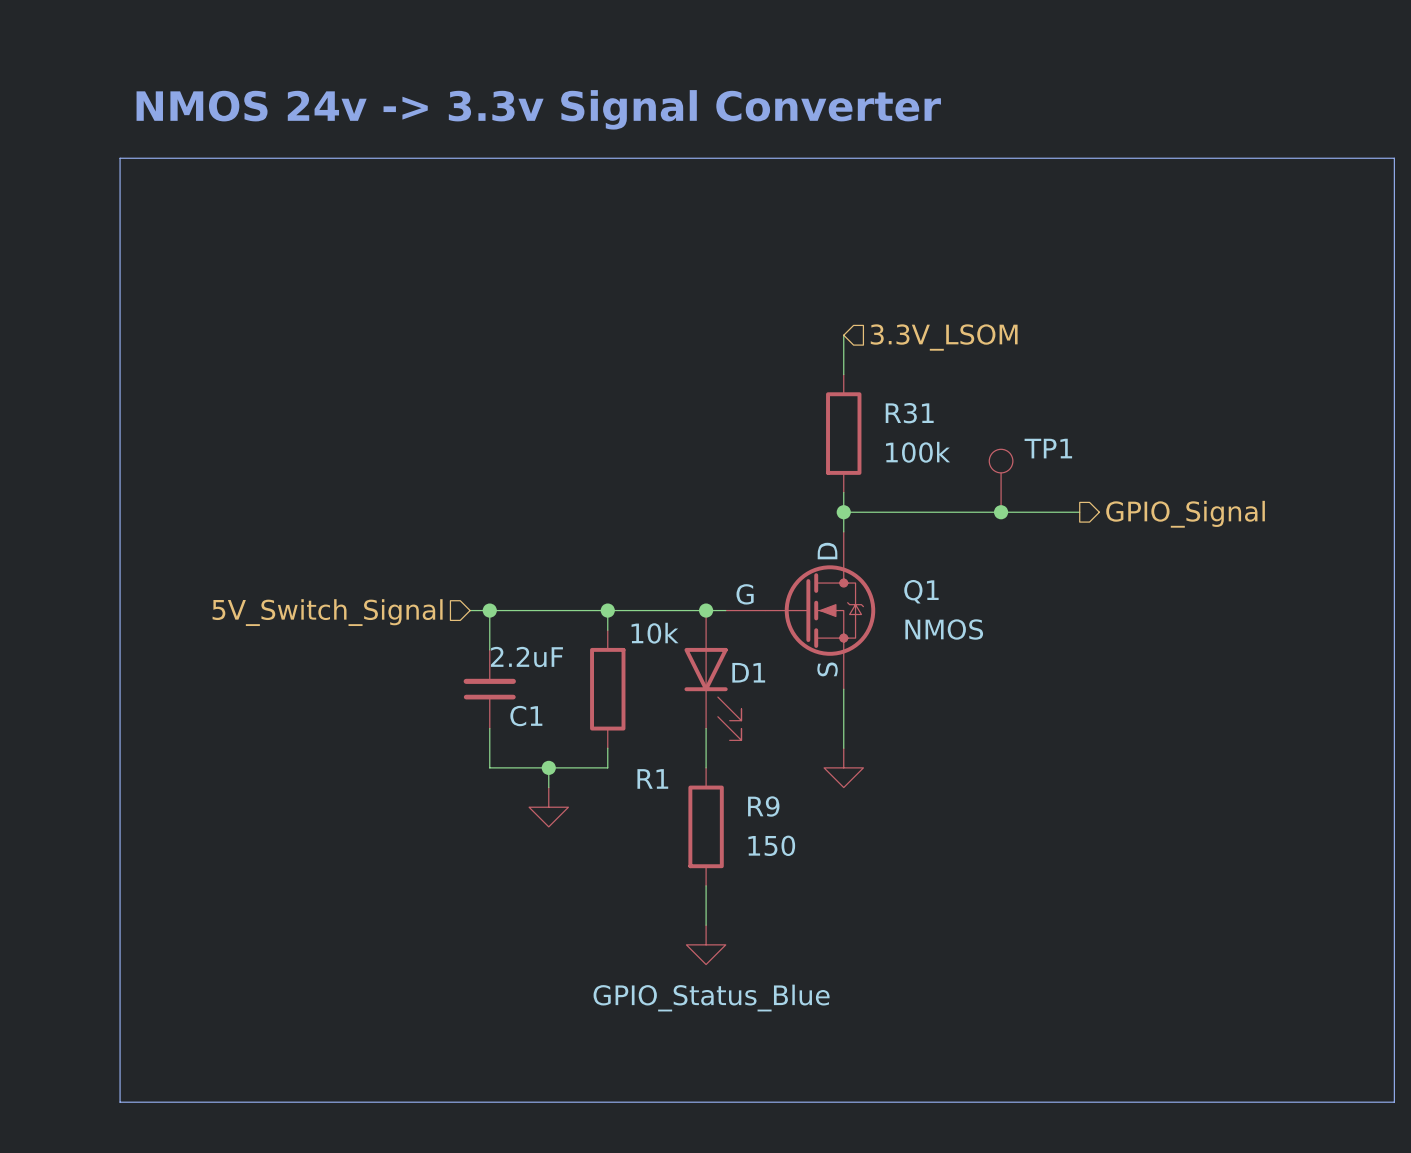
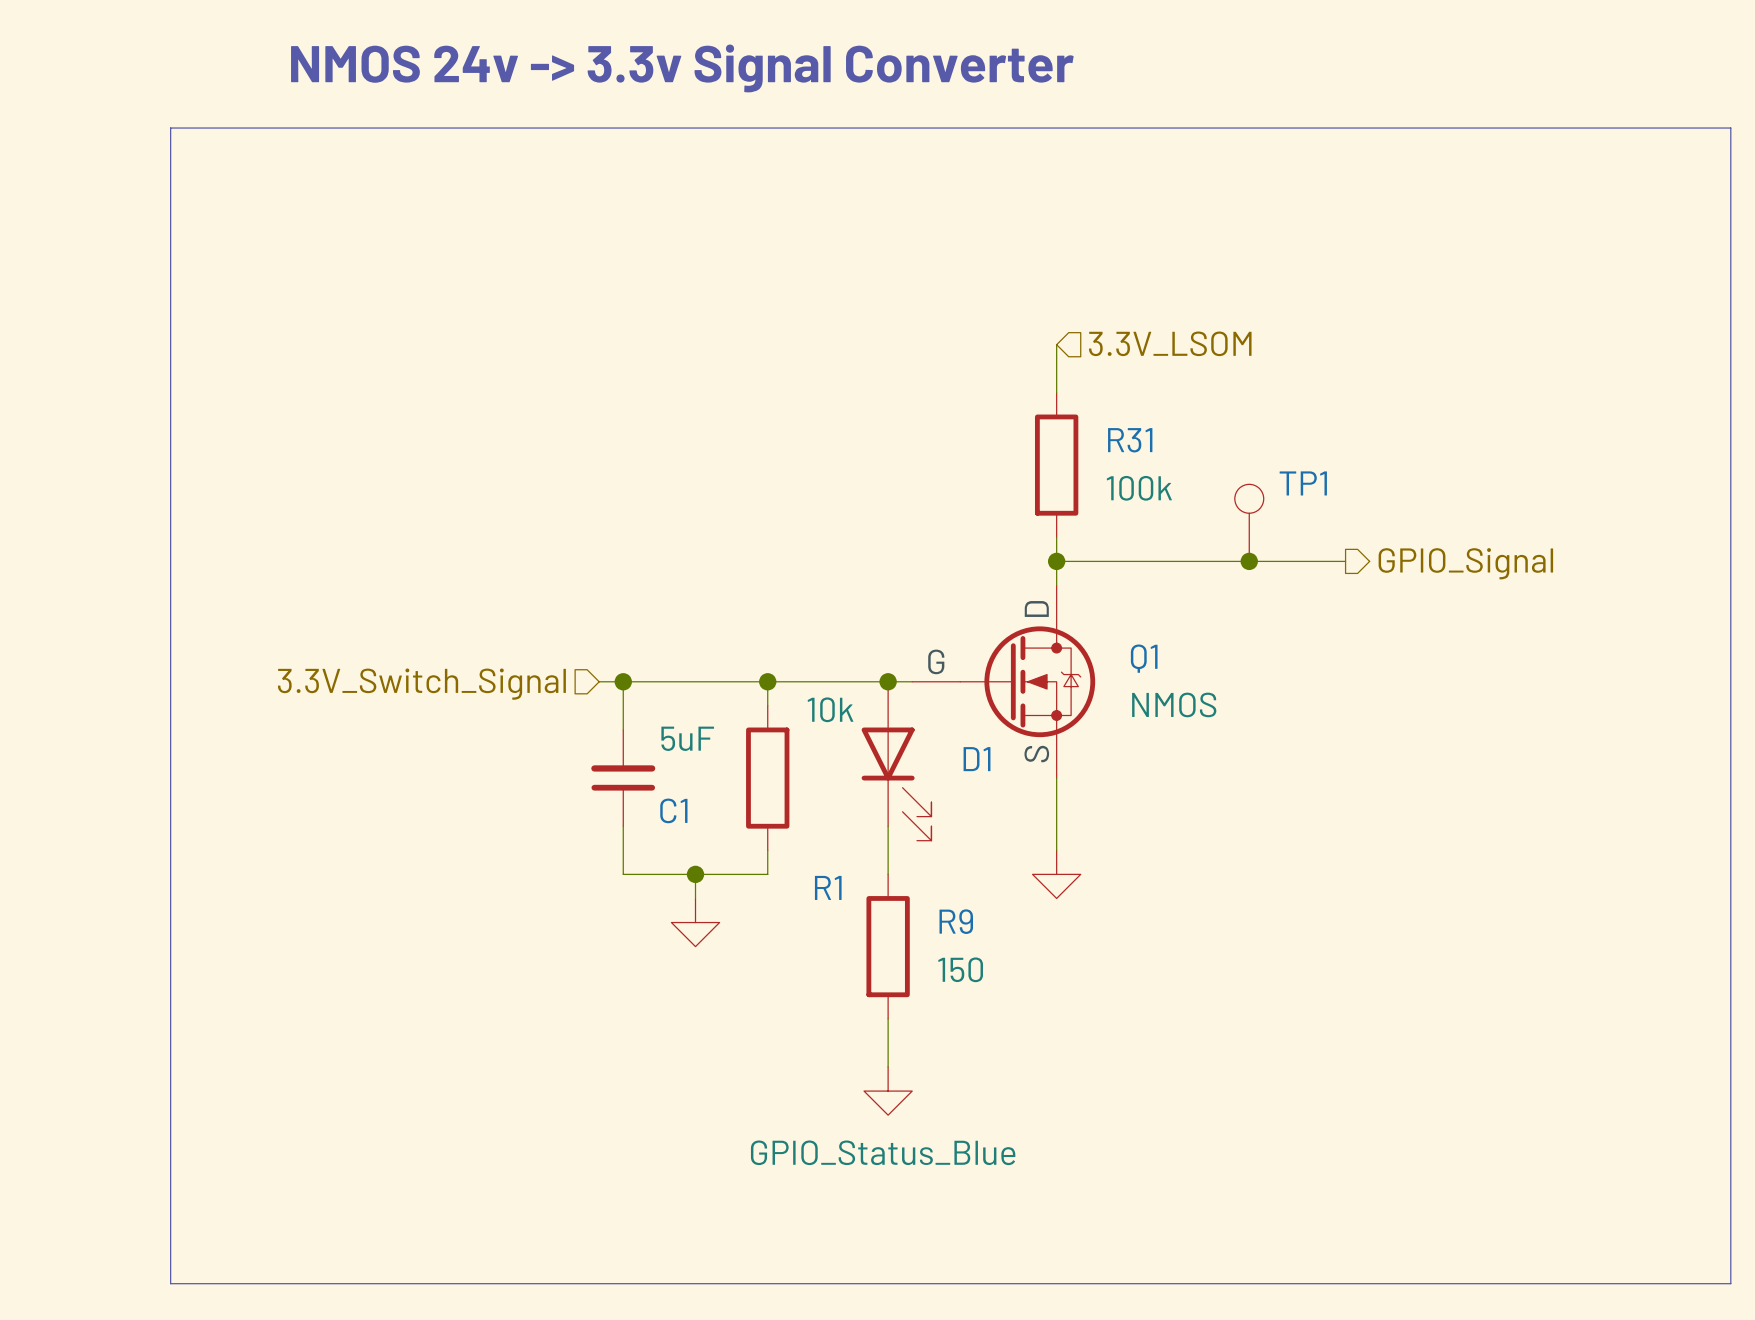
hierarchical label: 5V_Switch_Signal (327, 612) -> 3.3V_Switch_Signal (421, 684)
C1 value: 2.2uF (526, 657) -> 5uF (687, 738)
D1 name position: D1 (748, 672) -> D1 (977, 759)

